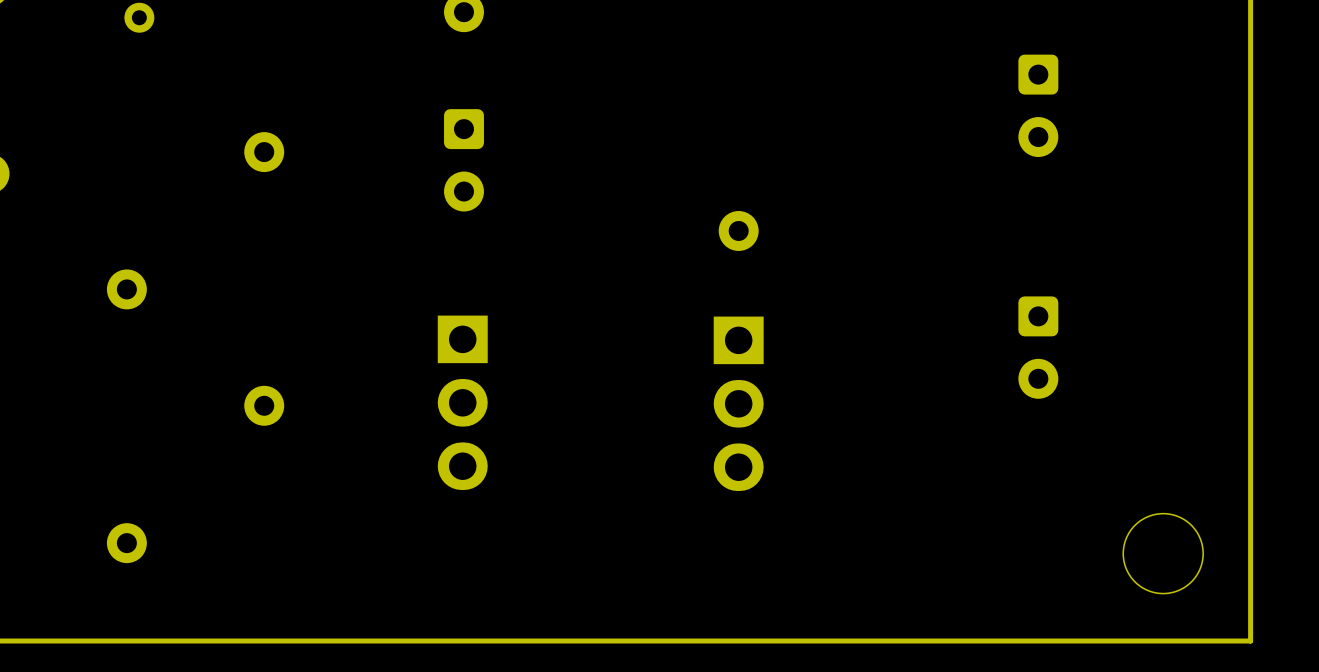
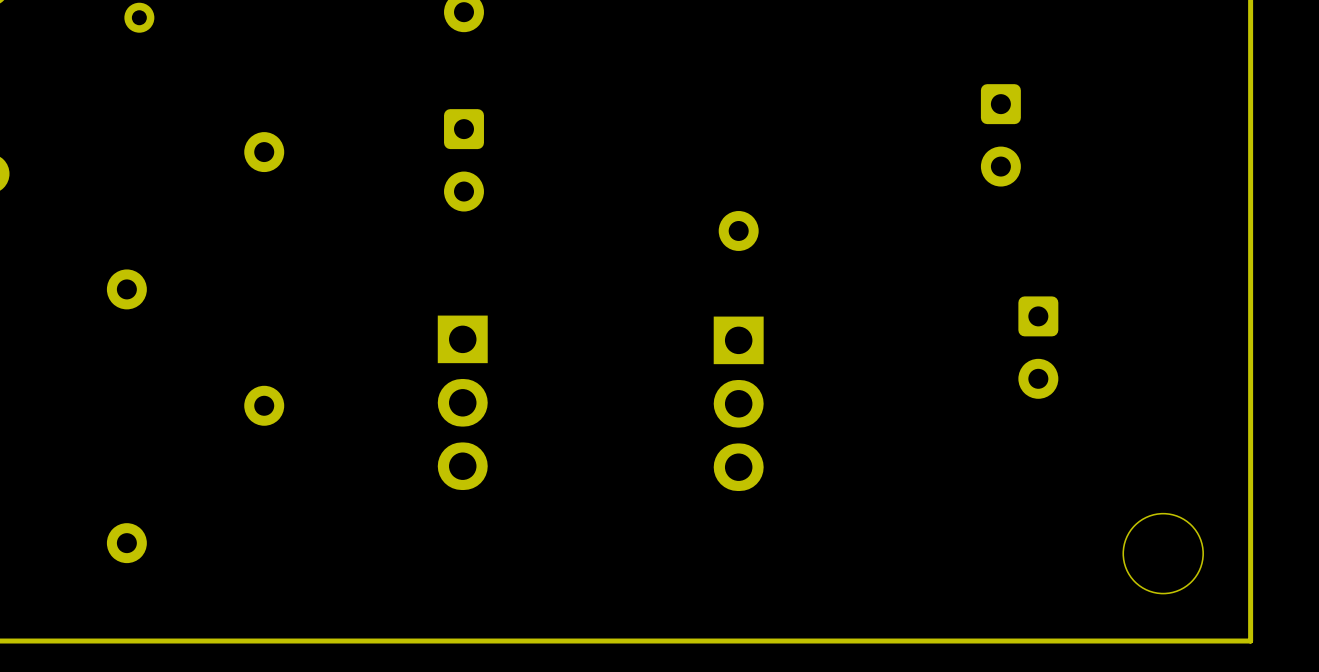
part position: (1038, 105) -> (1000, 135)

